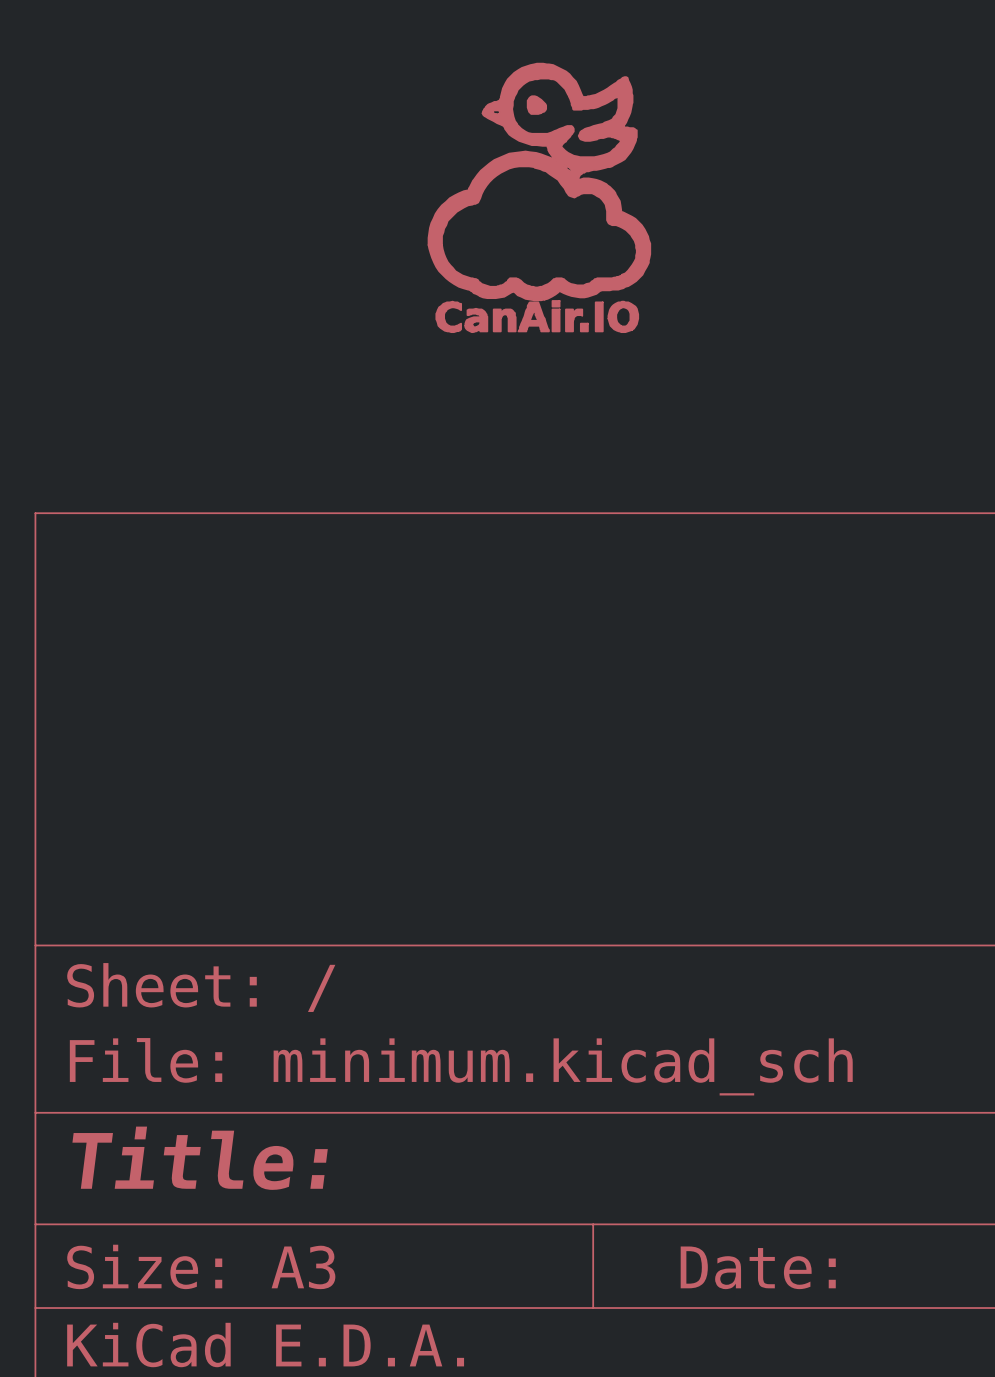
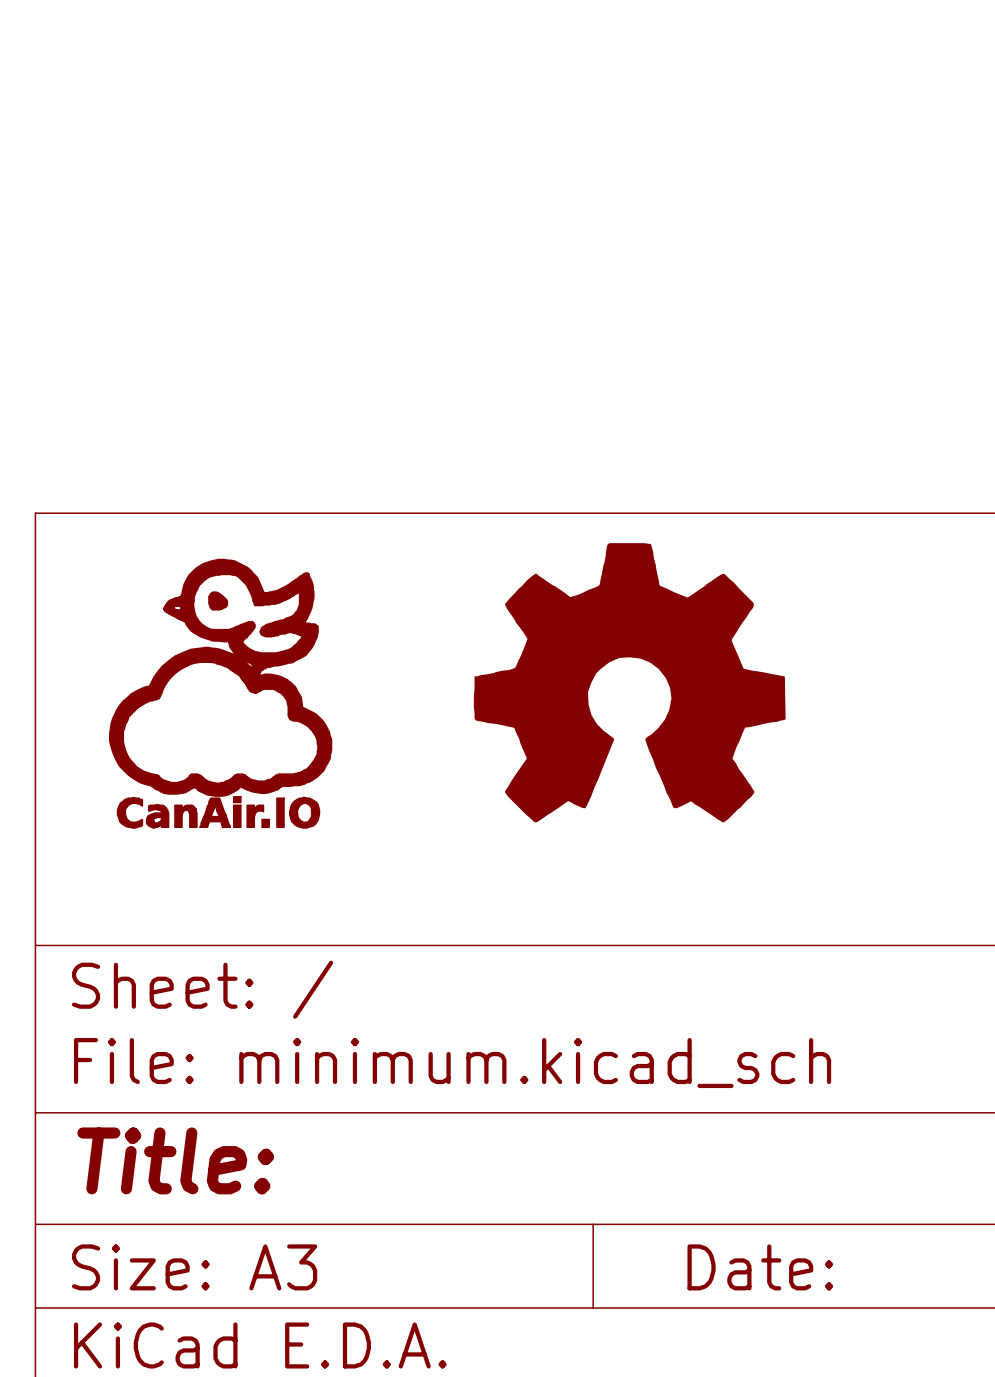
part position: (539, 197) -> (220, 693)
part: none -> (629, 682)

